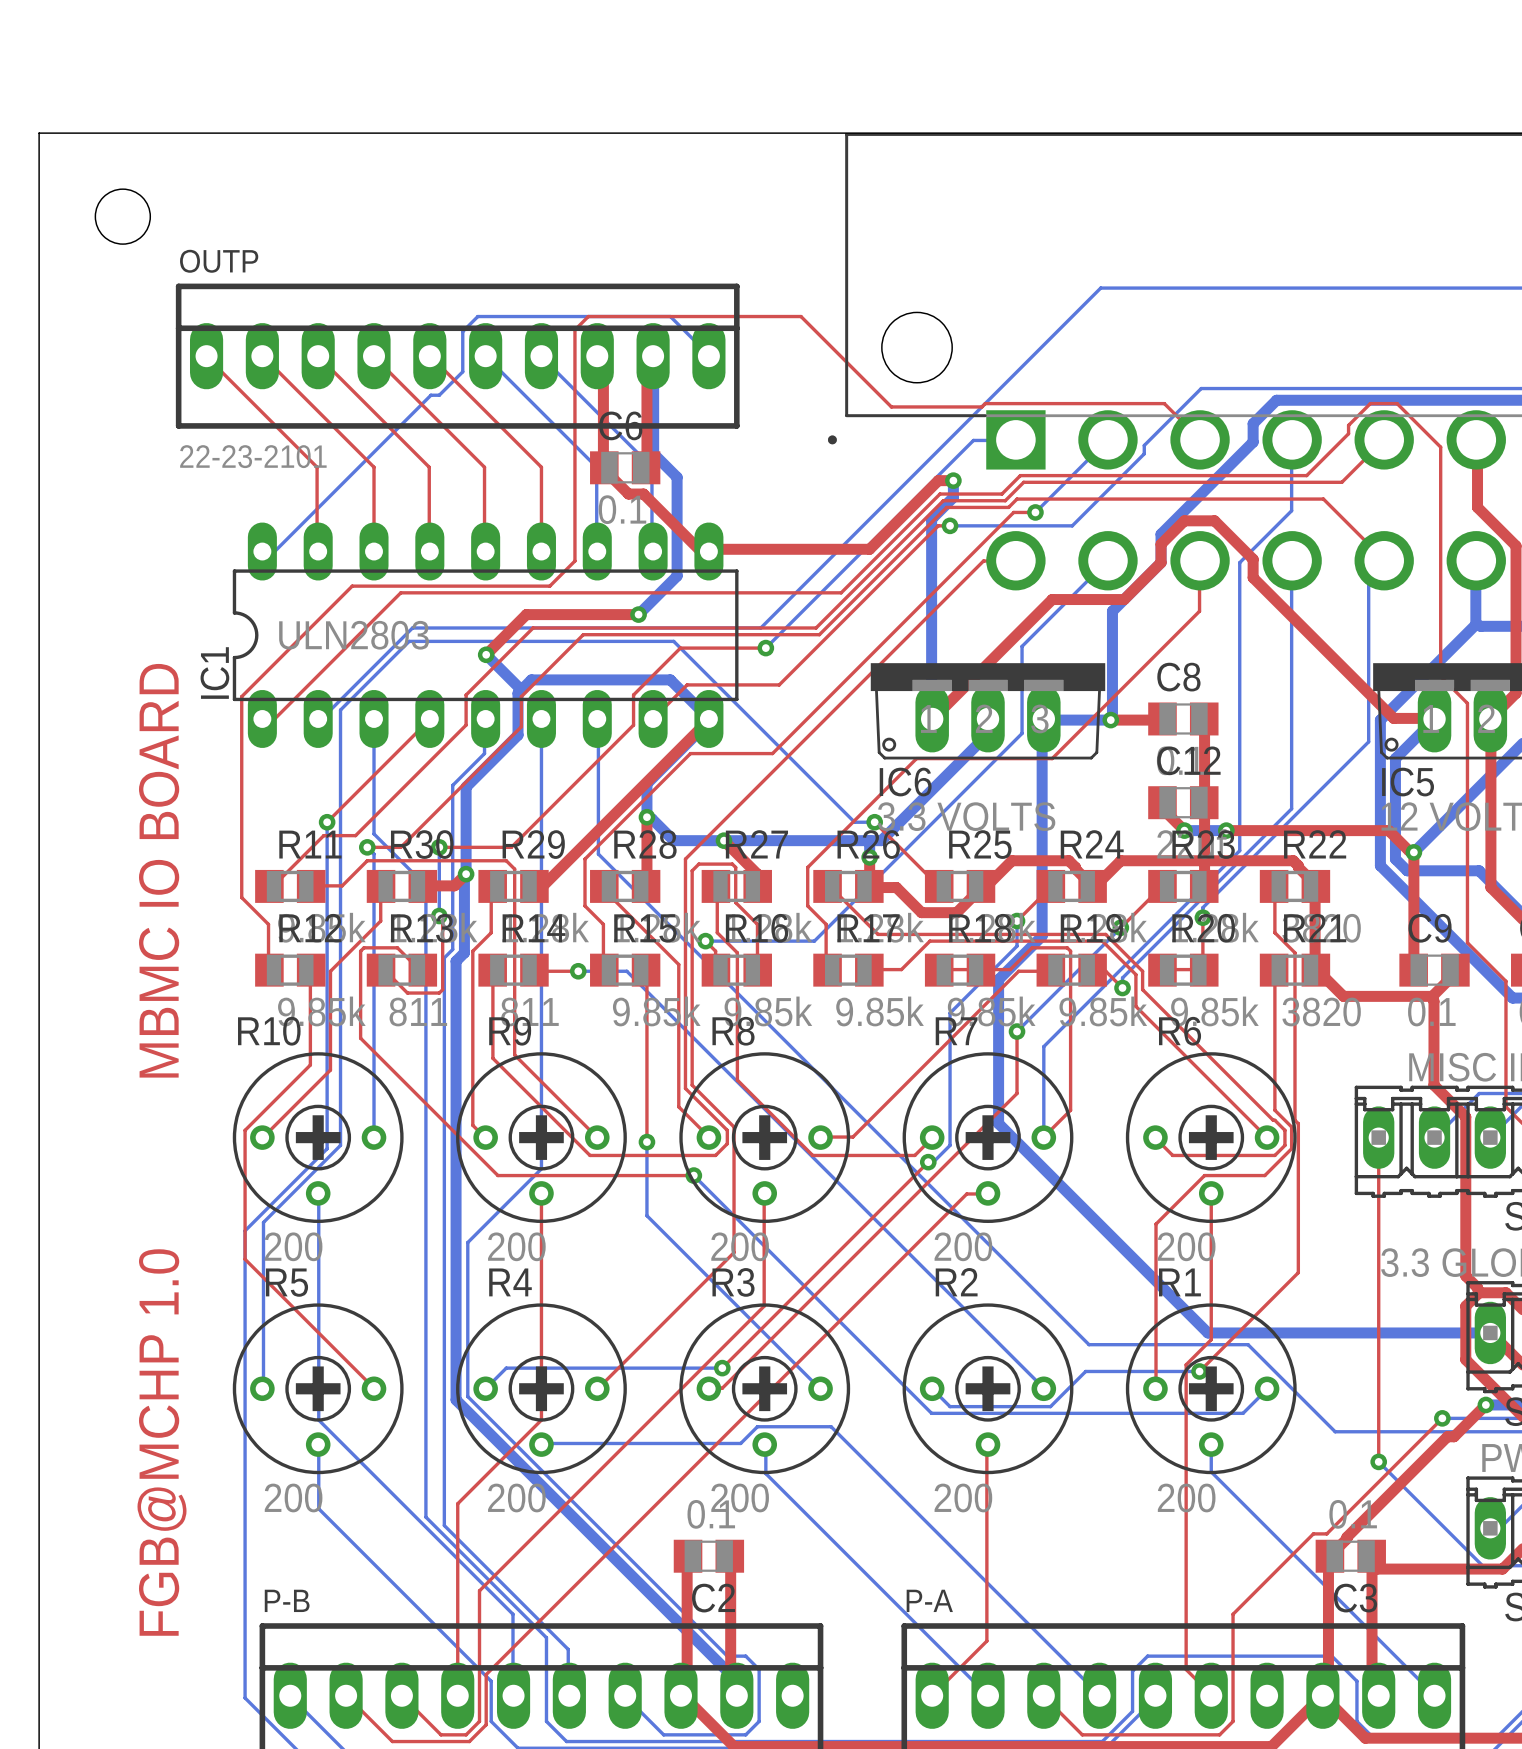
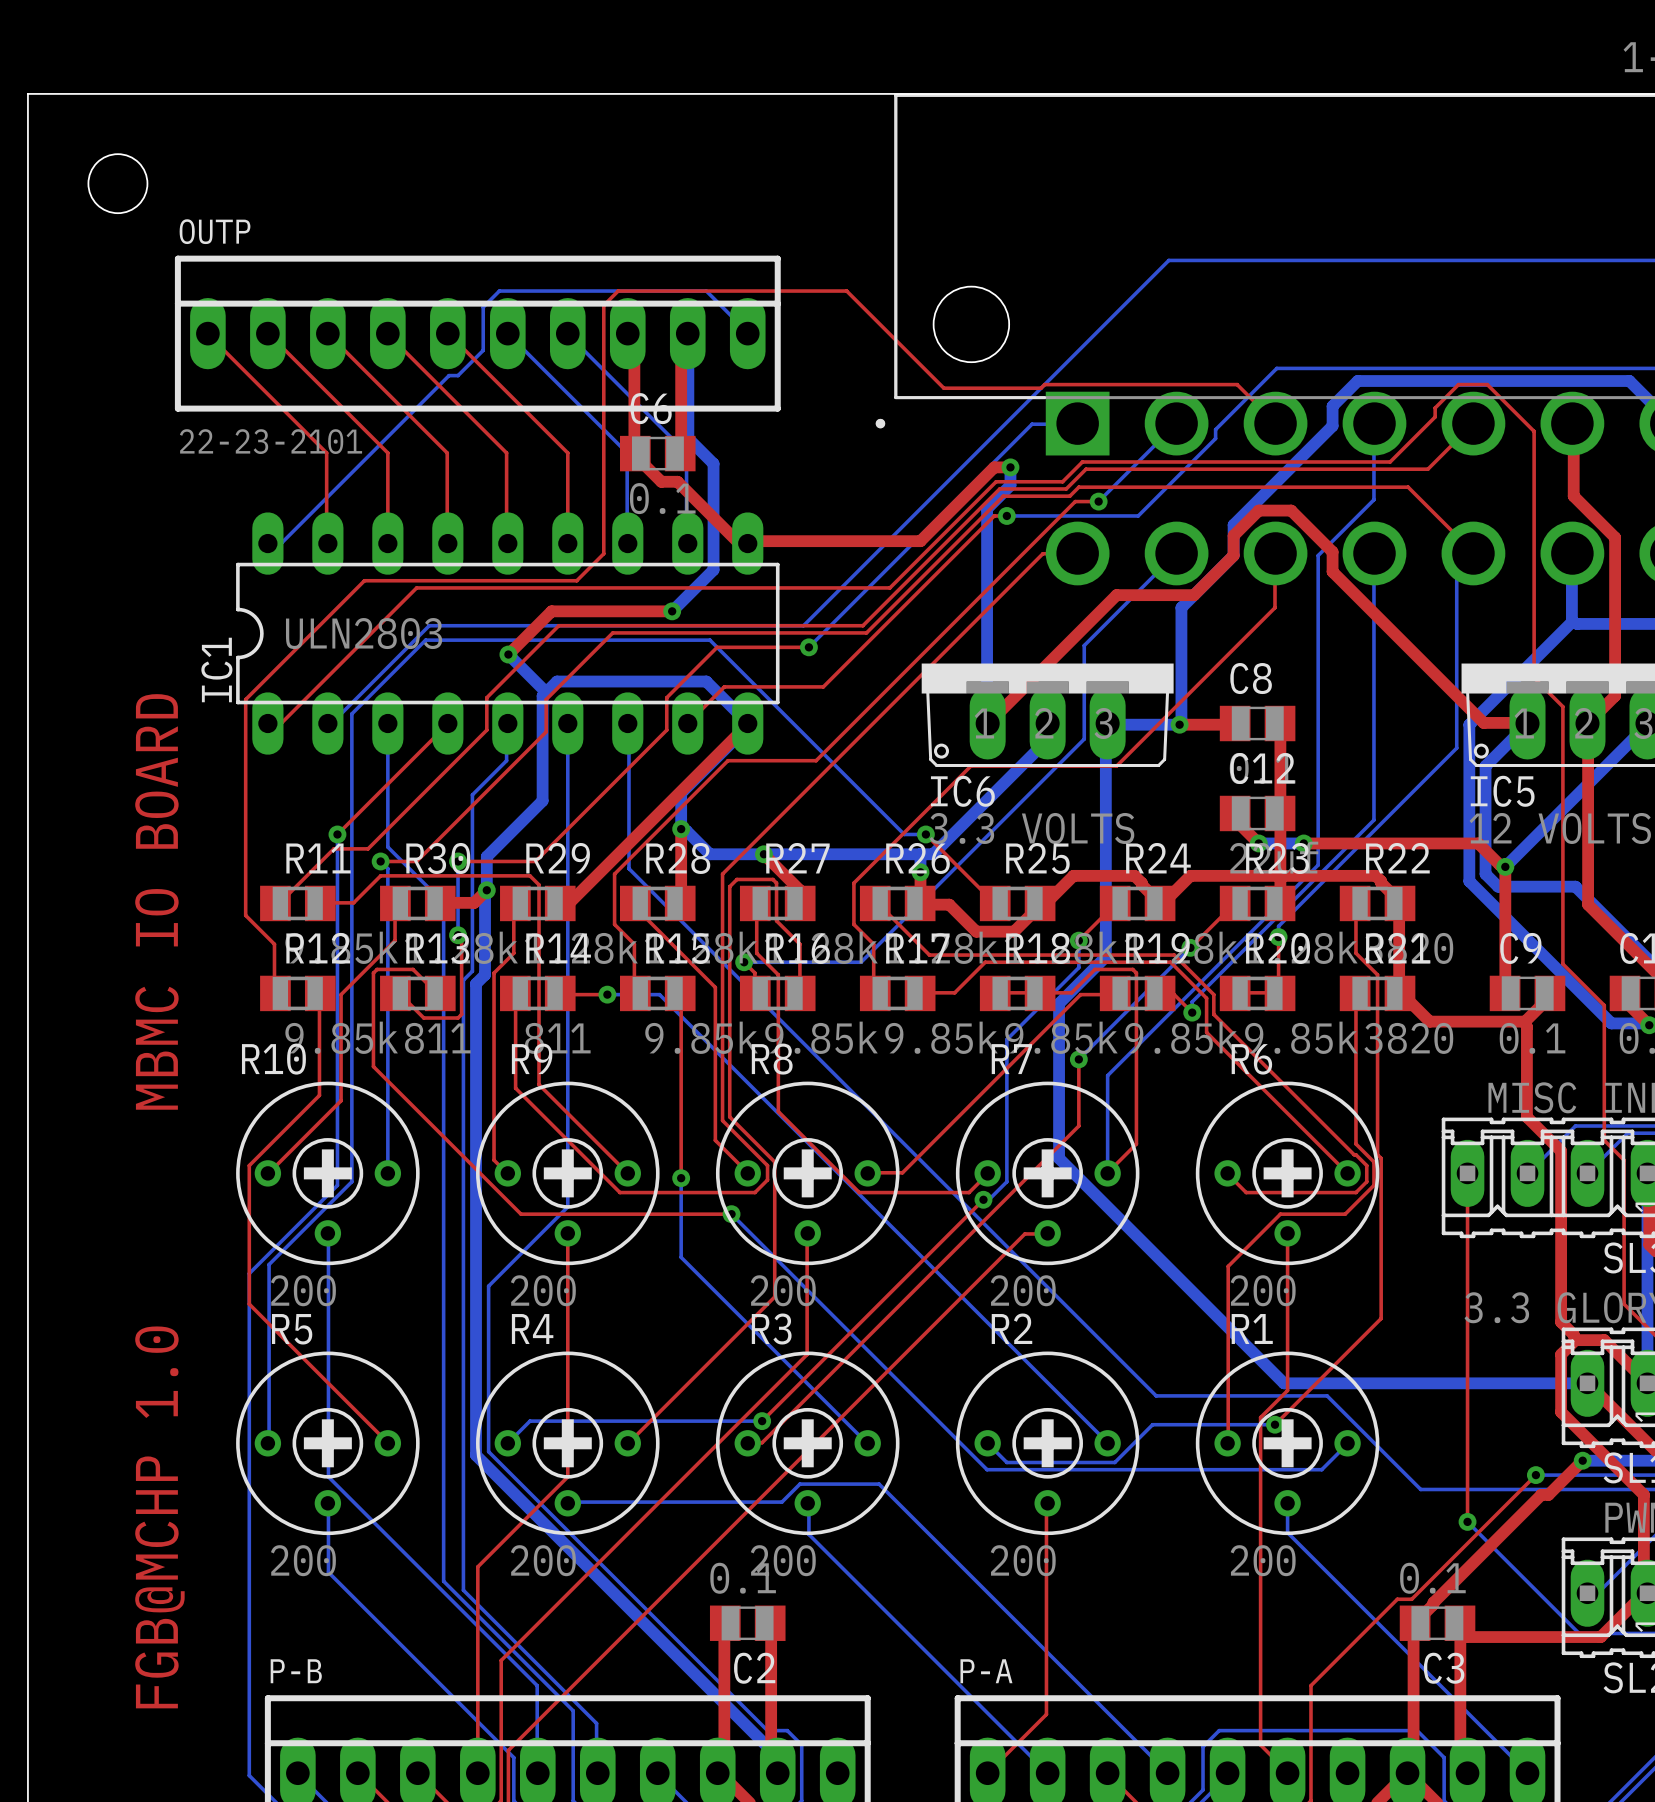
bottom track: (518, 735) (466, 787) (466, 842) -> (542, 740) (542, 800) (486, 856)

